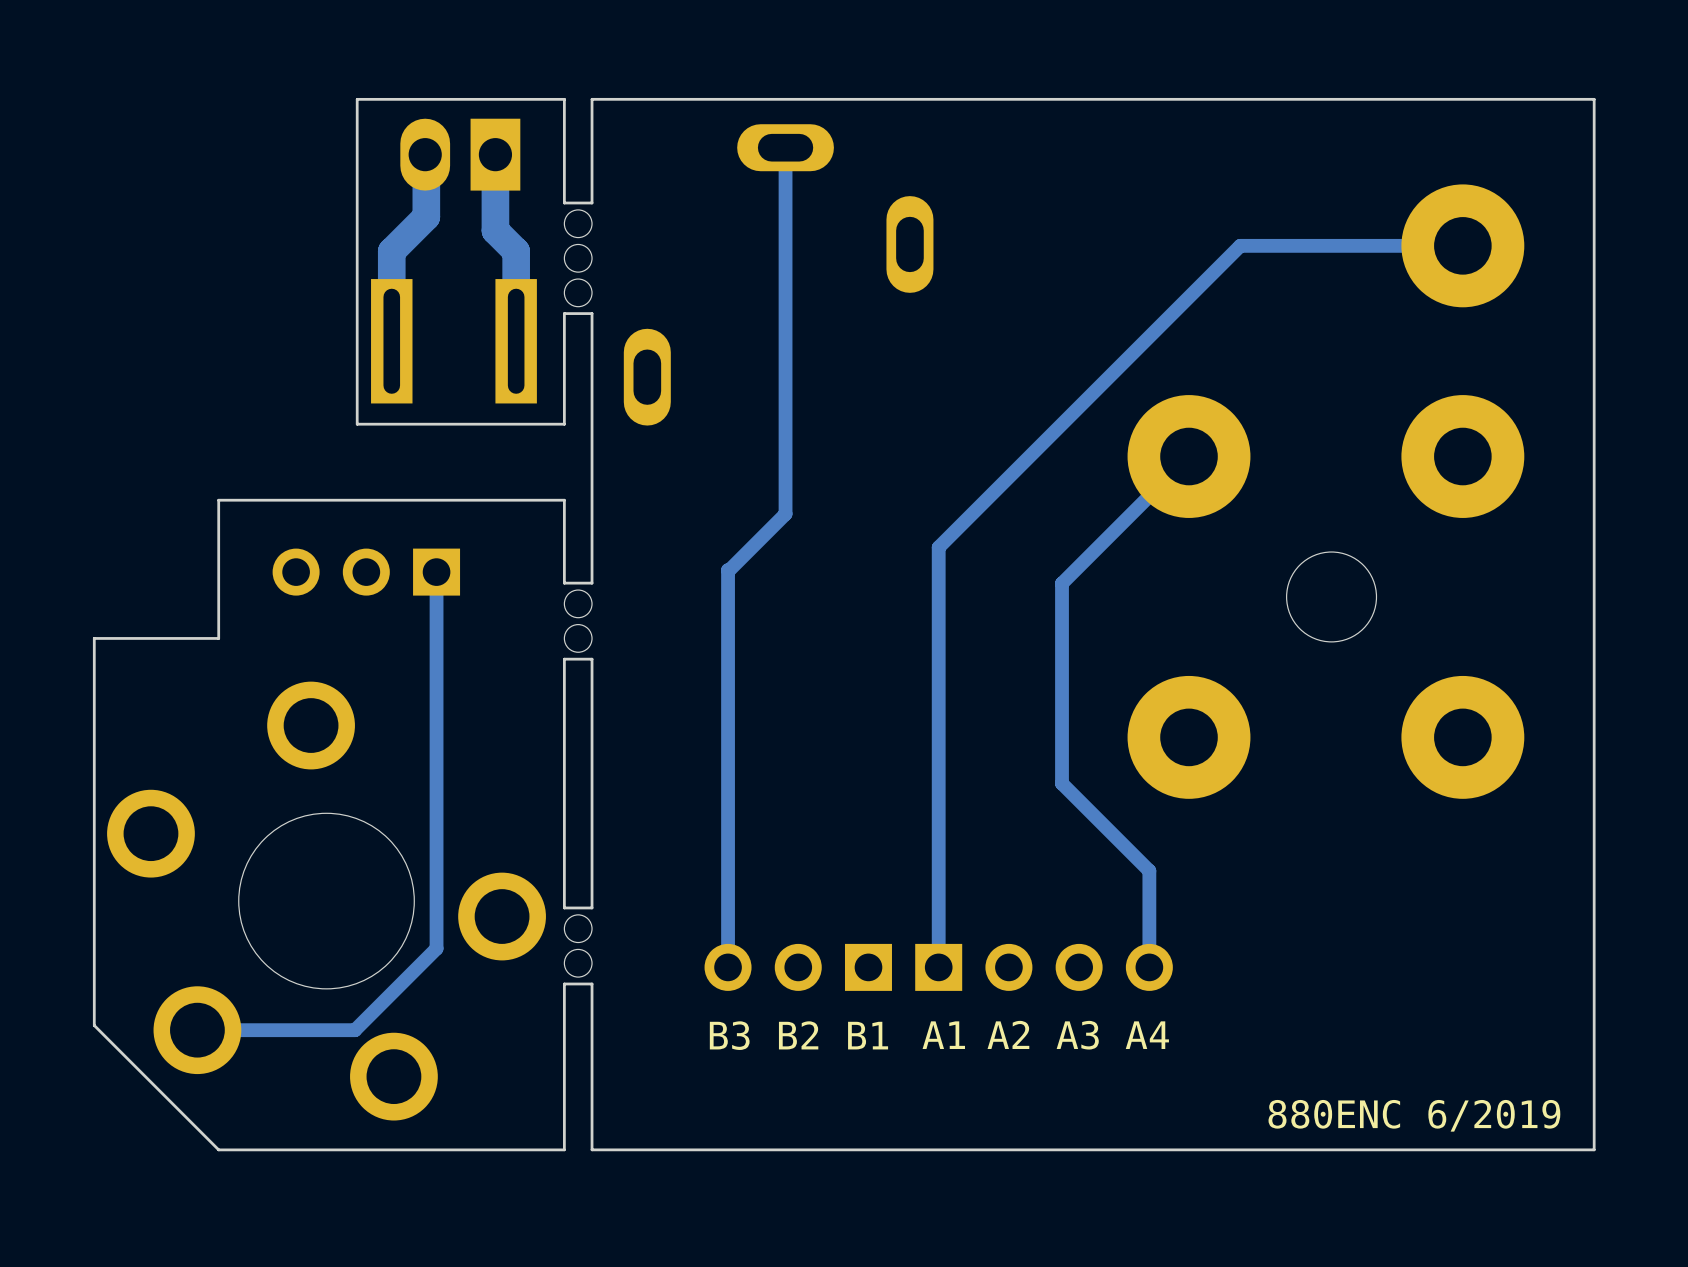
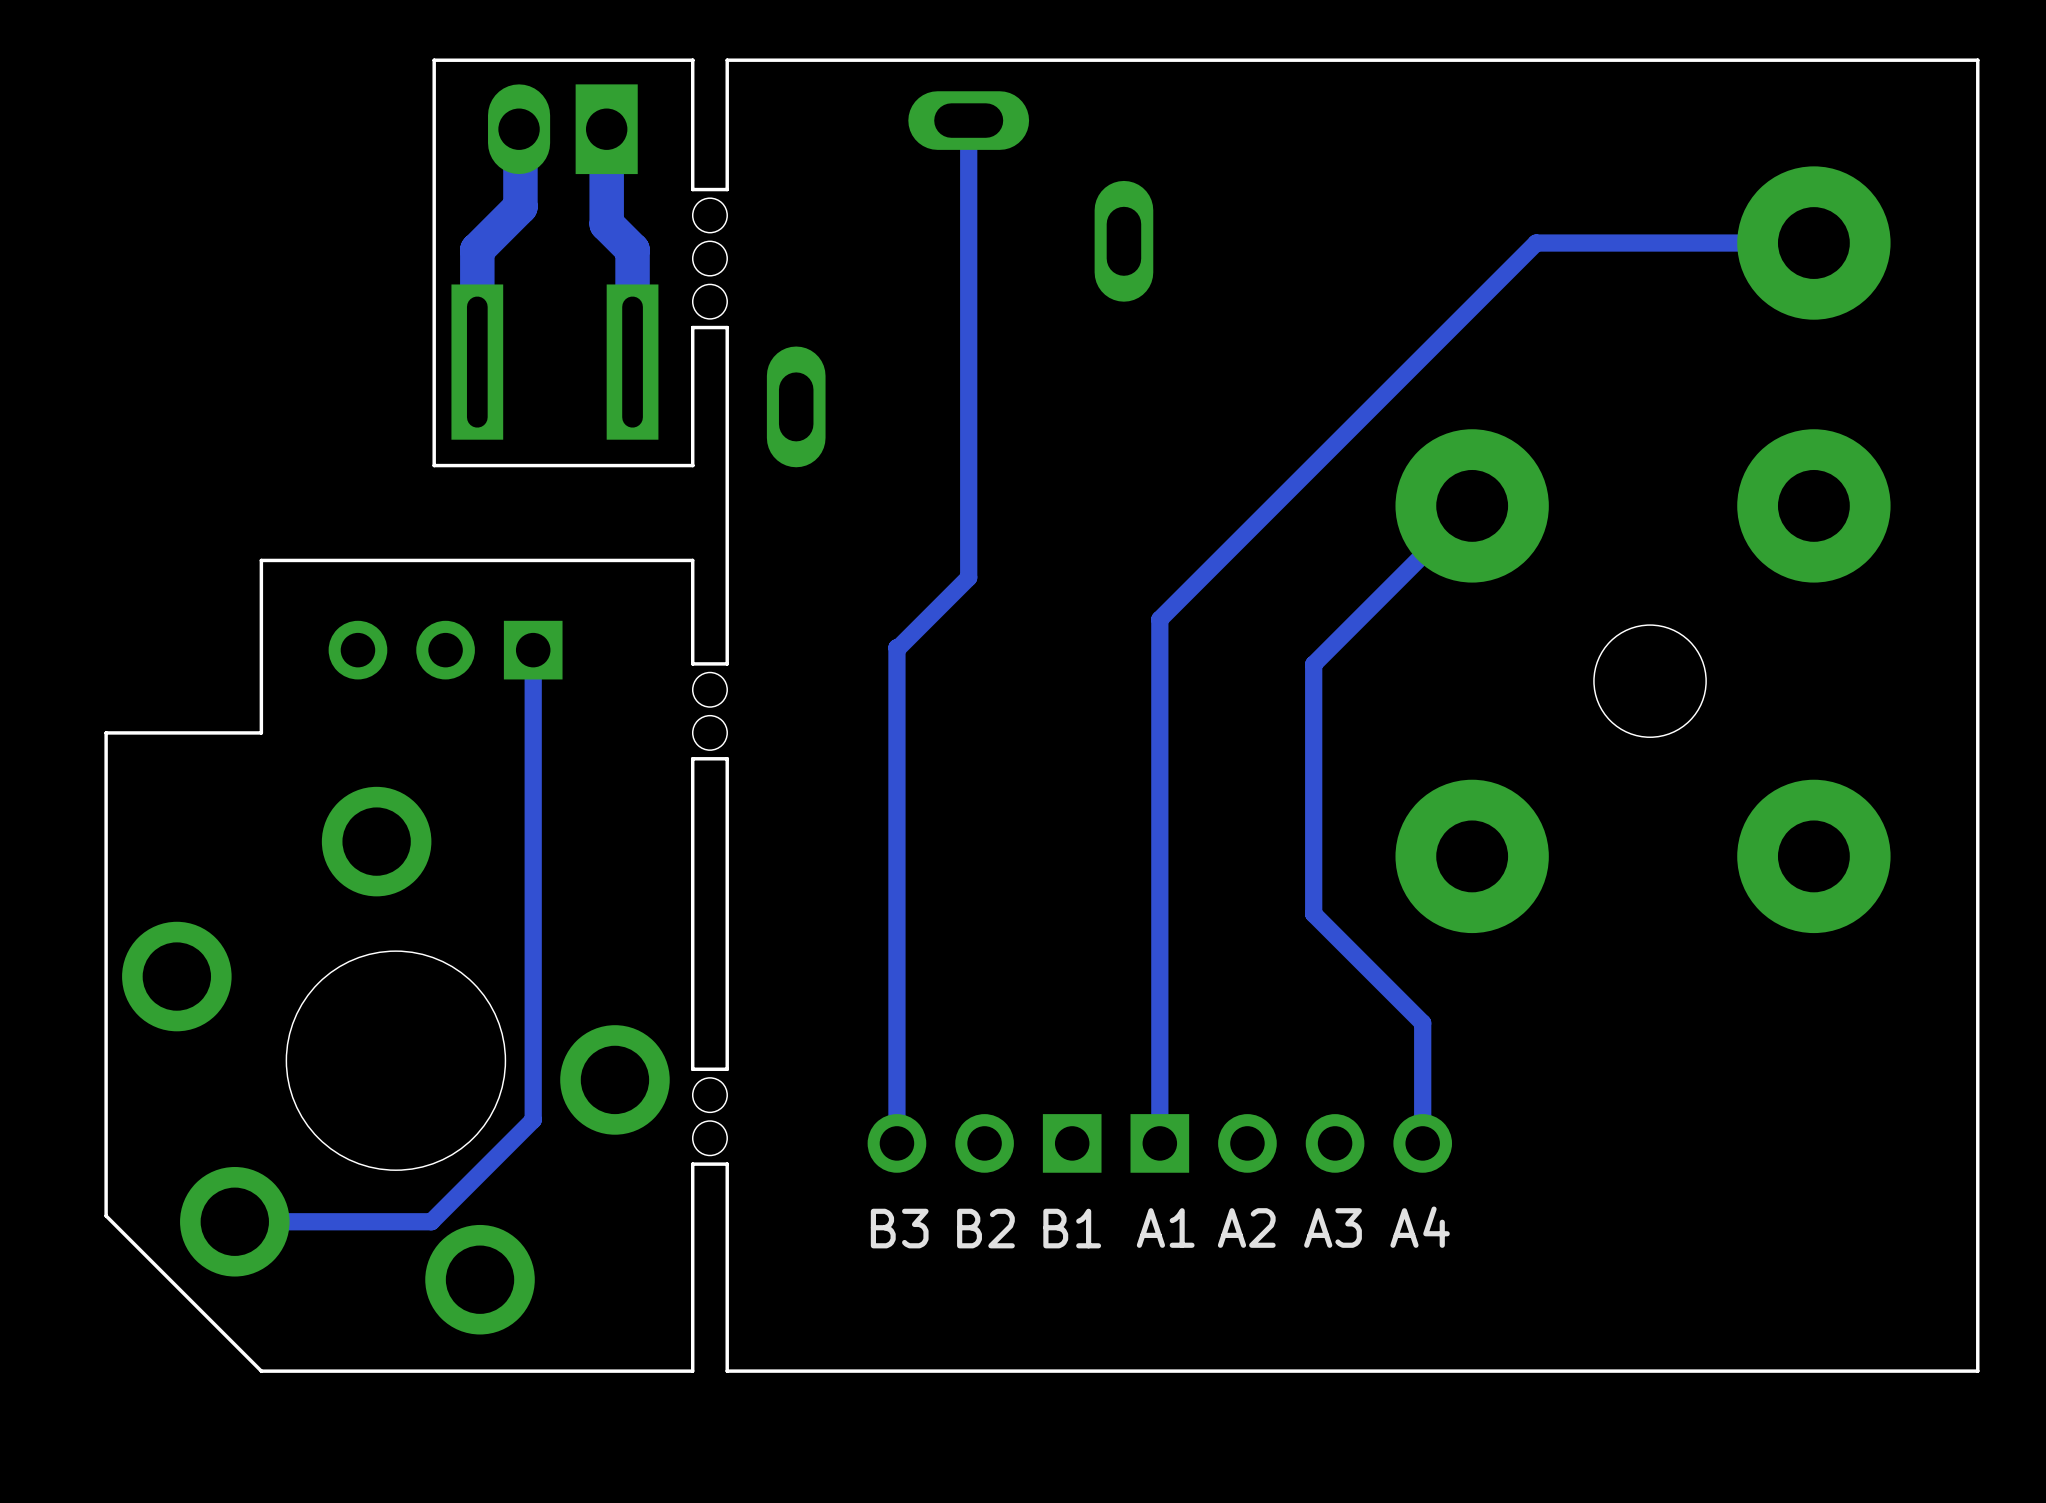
text: 880ENC 6/2019 (1414, 1115) -> none

